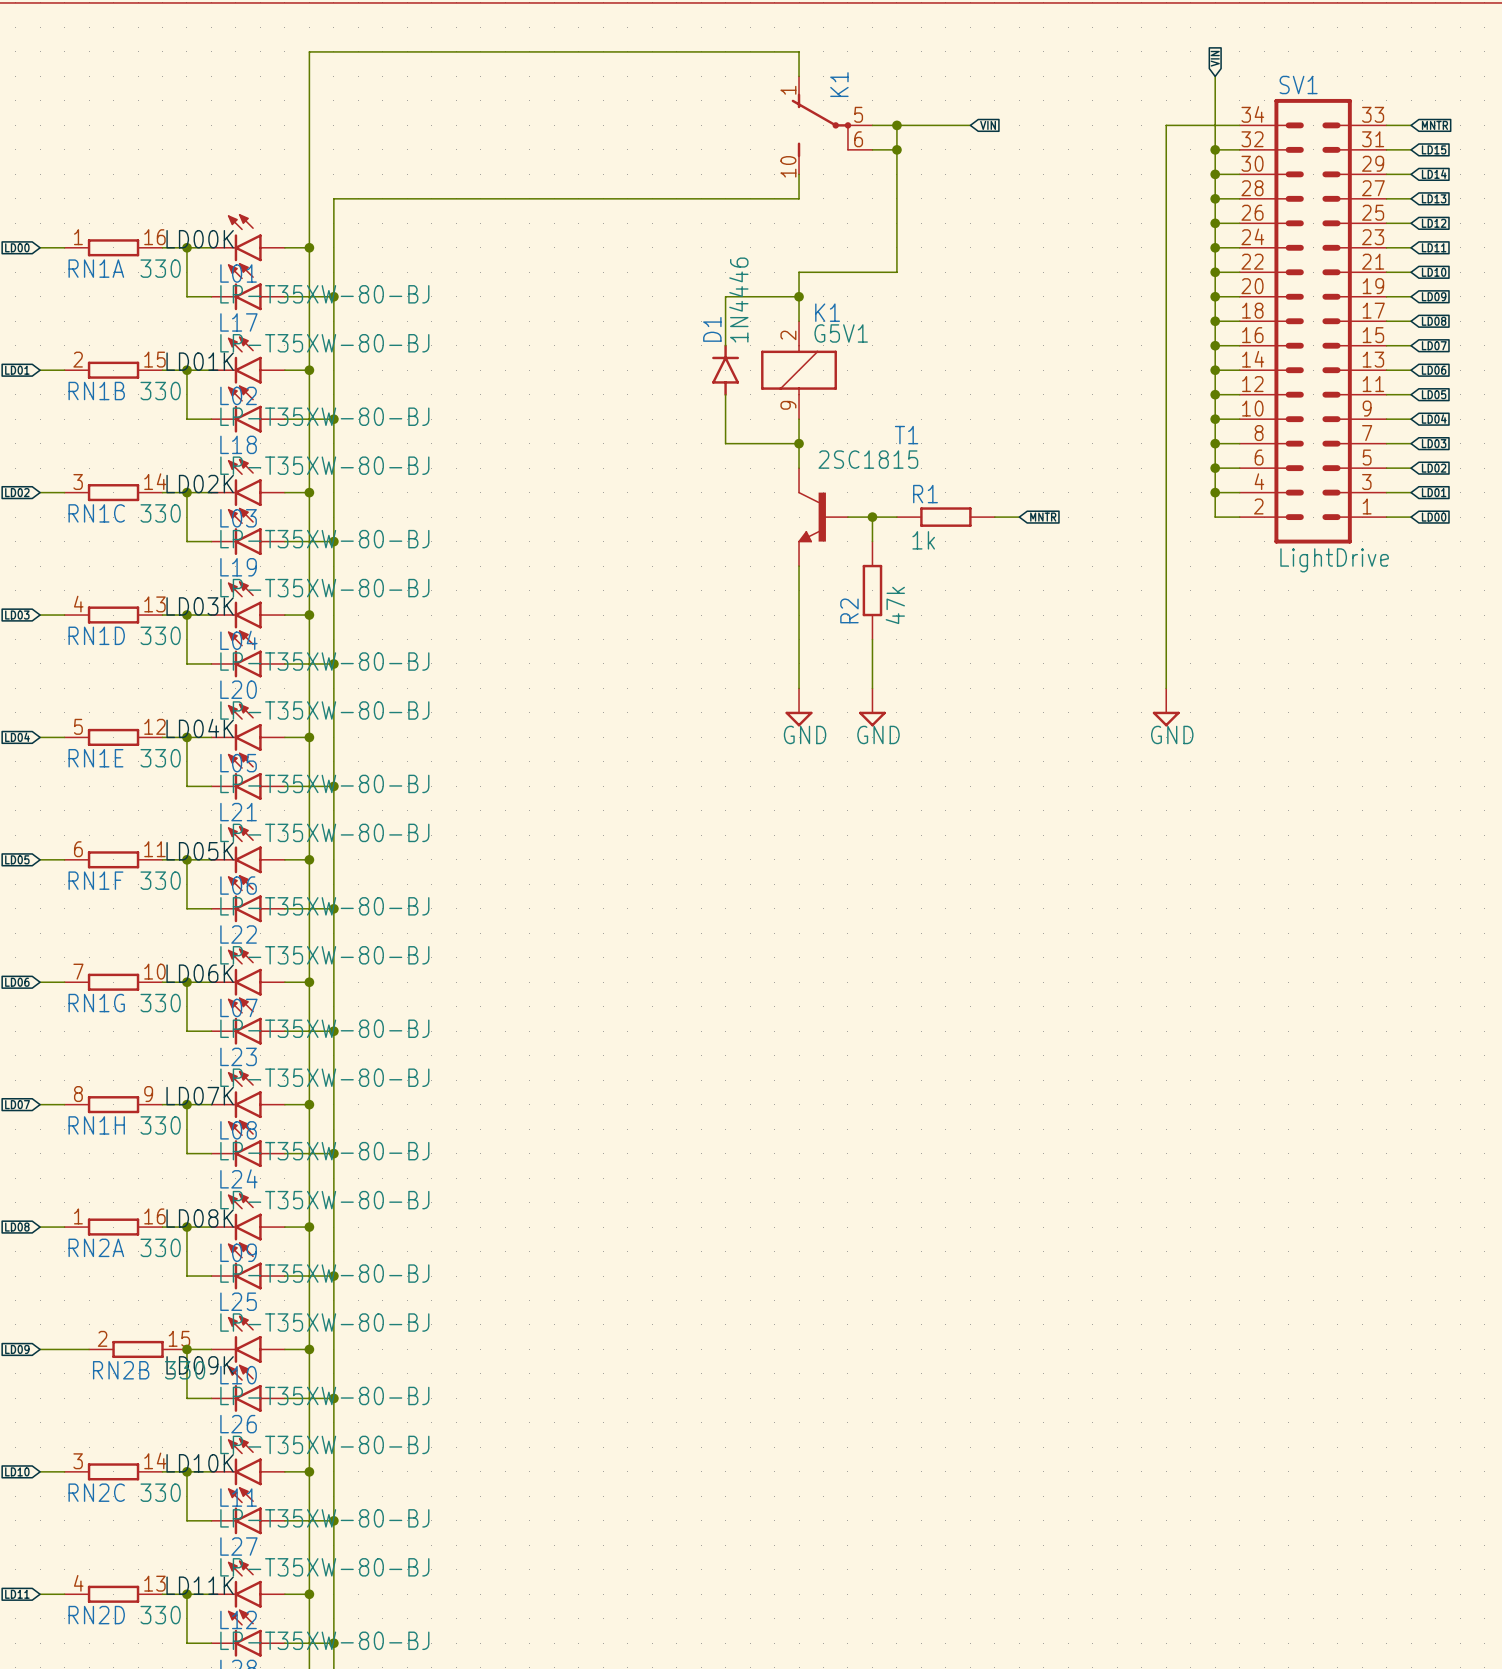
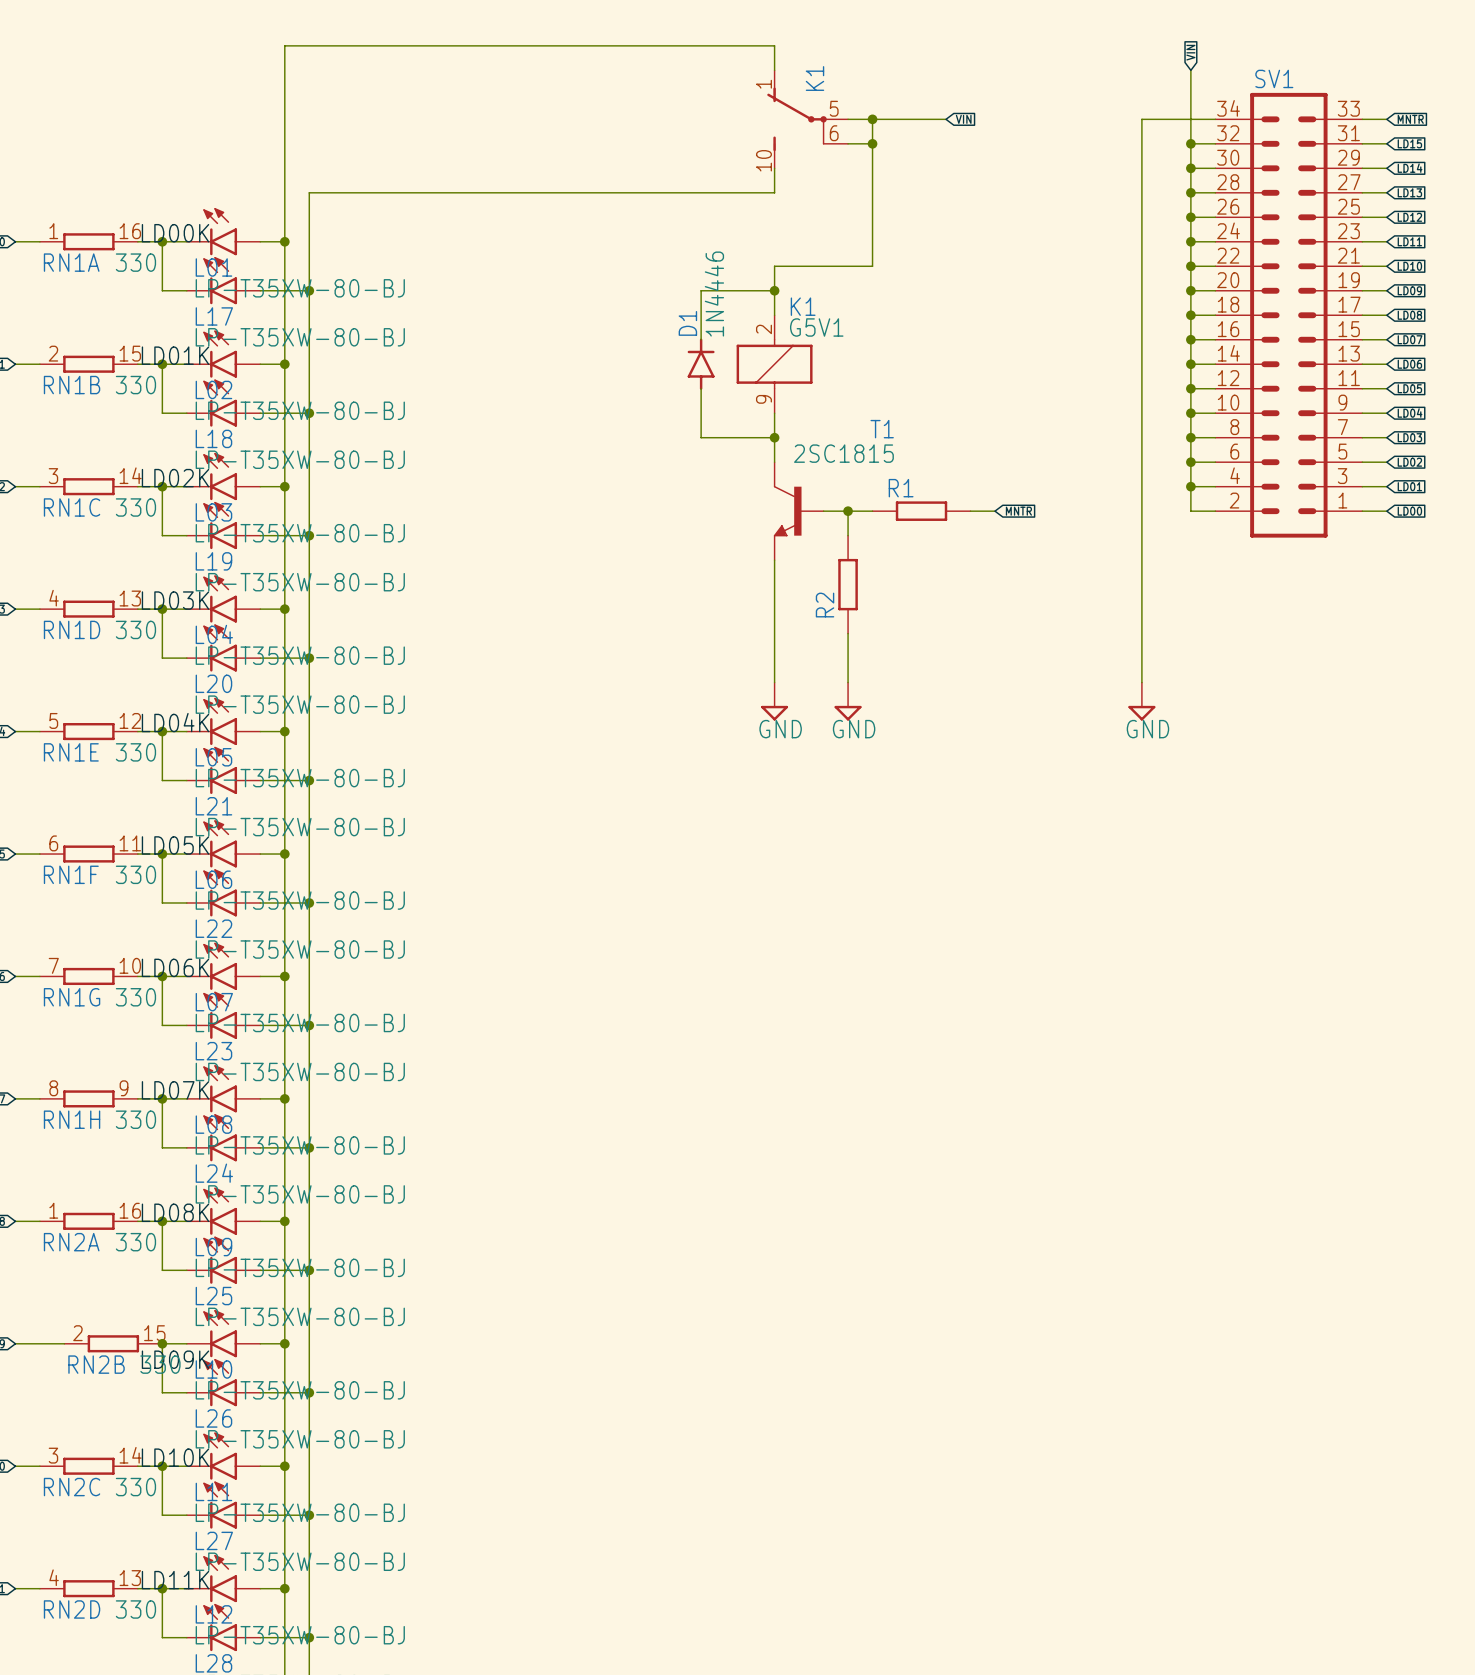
R1 value: 1k (923, 540) -> none
SV1 value: LightDrive (1334, 560) -> none
R2 value: 47k (895, 605) -> none

